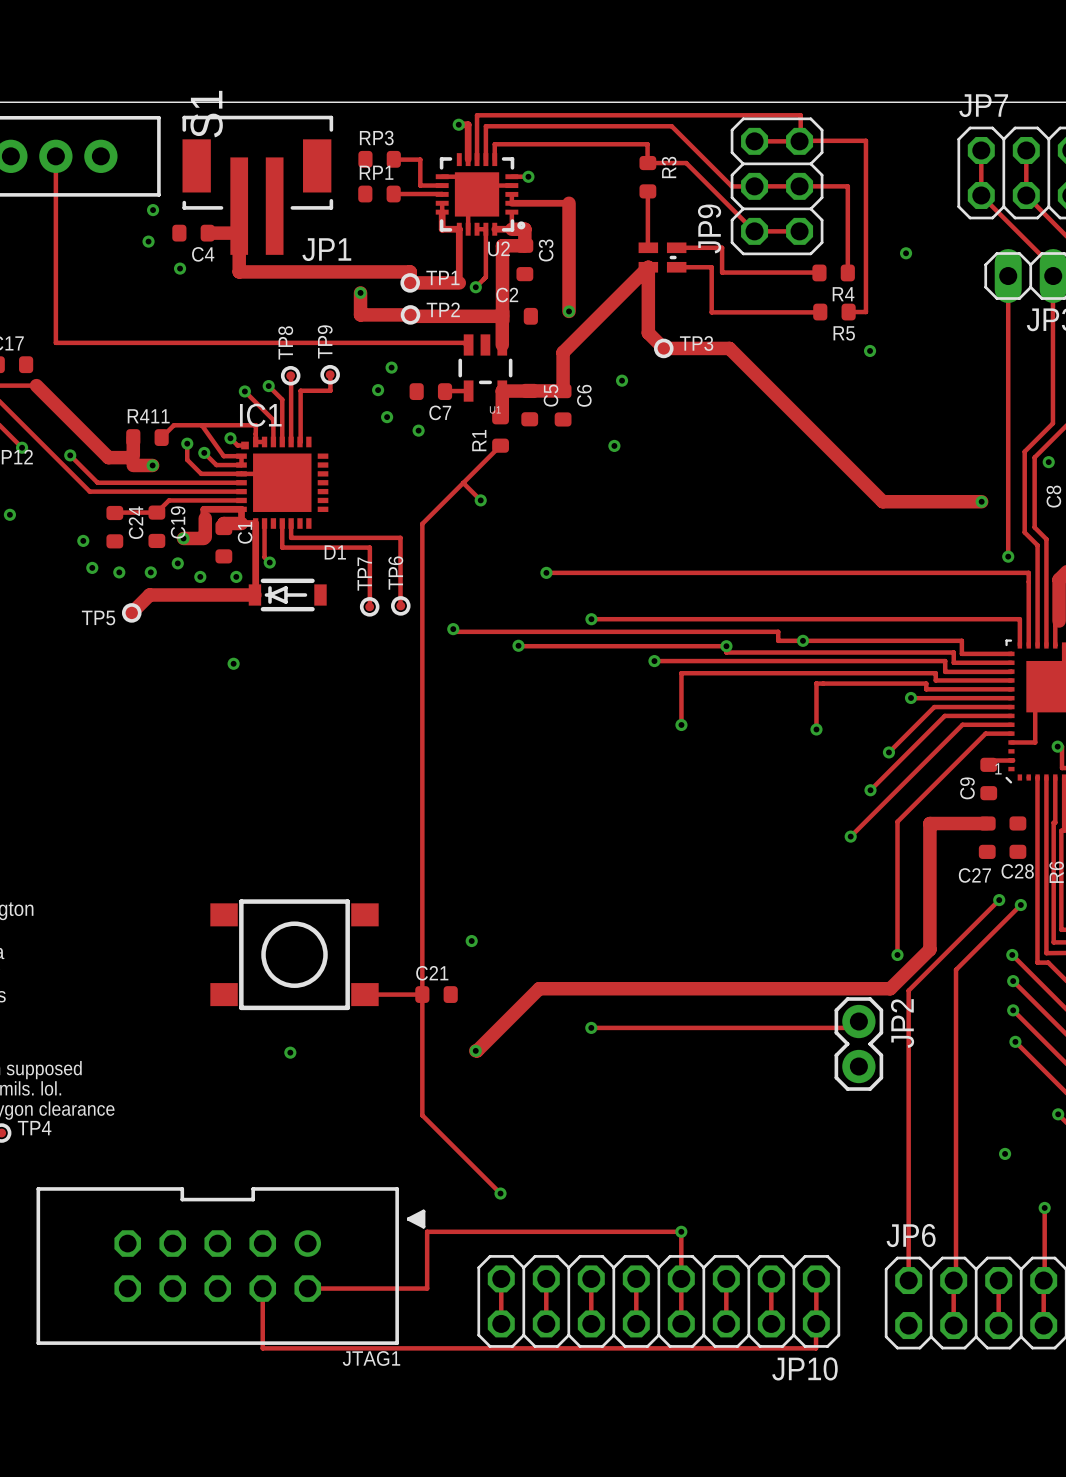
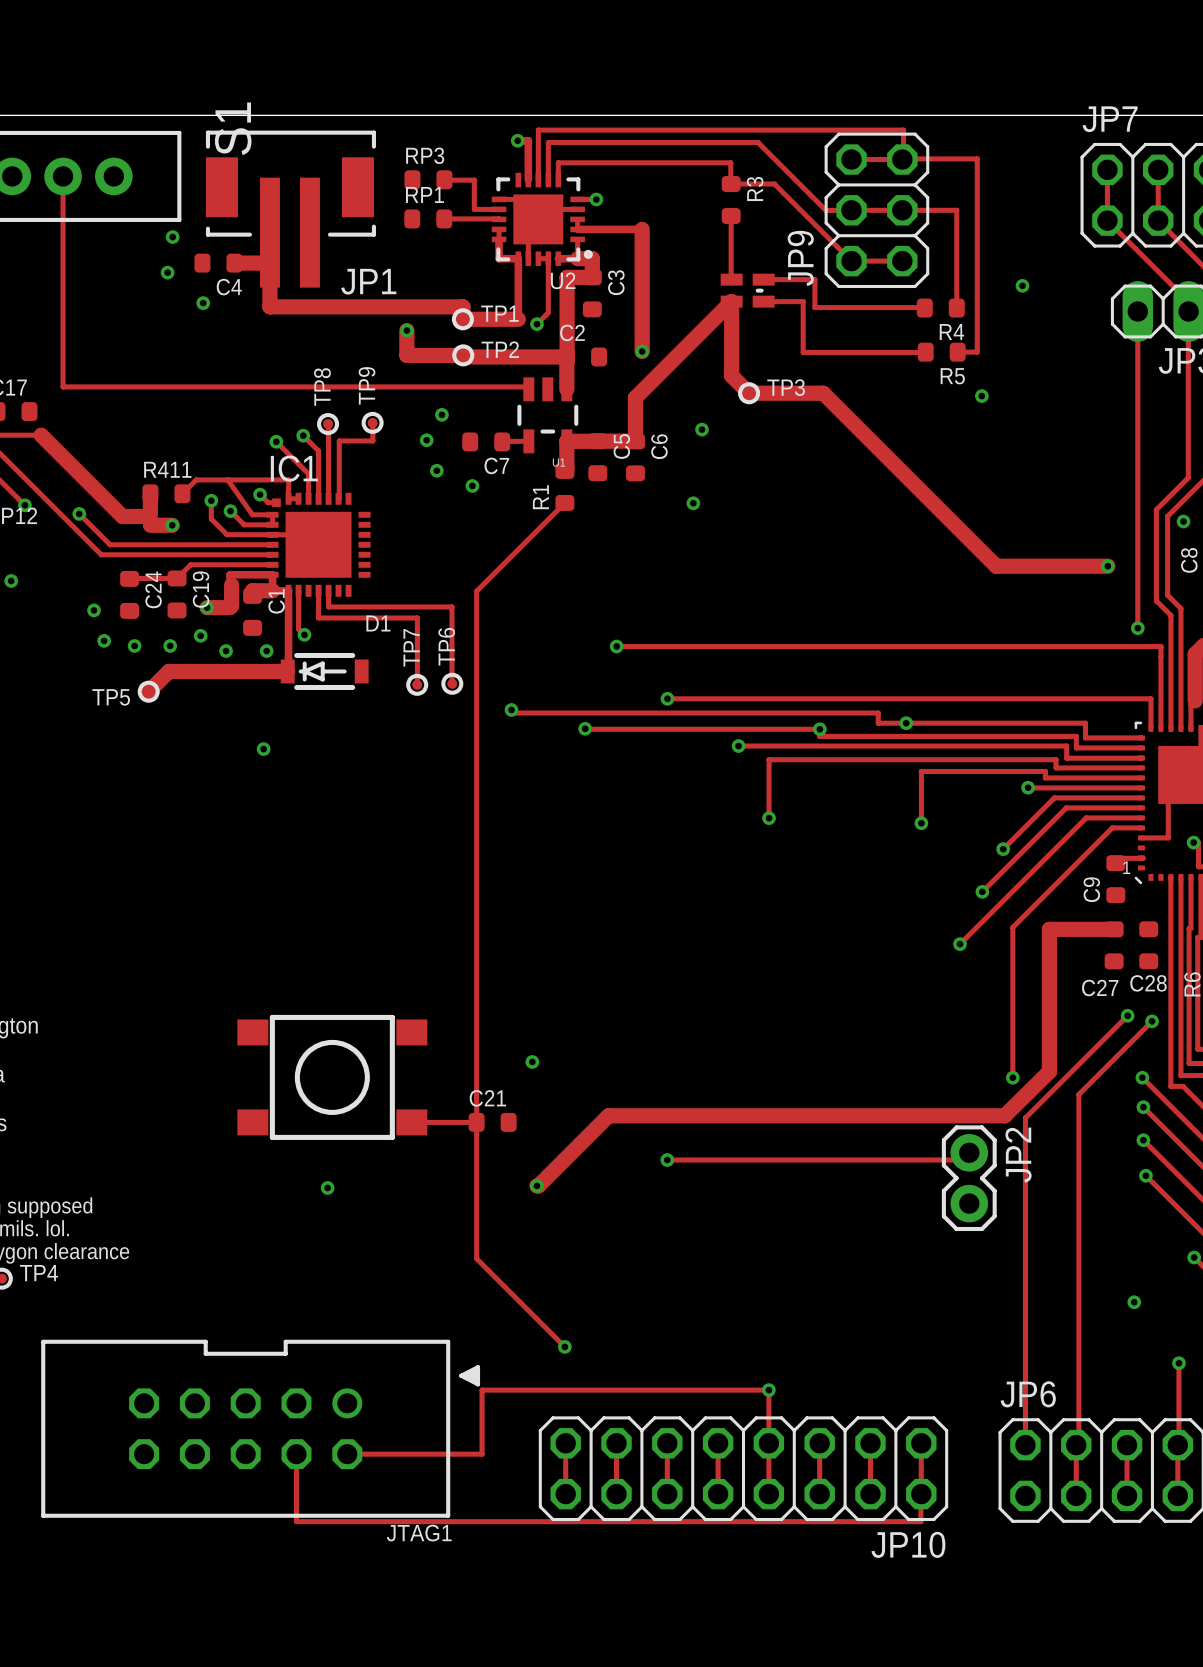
track: (463, 482) (480, 500) -> none
via: (480, 500) -> none

